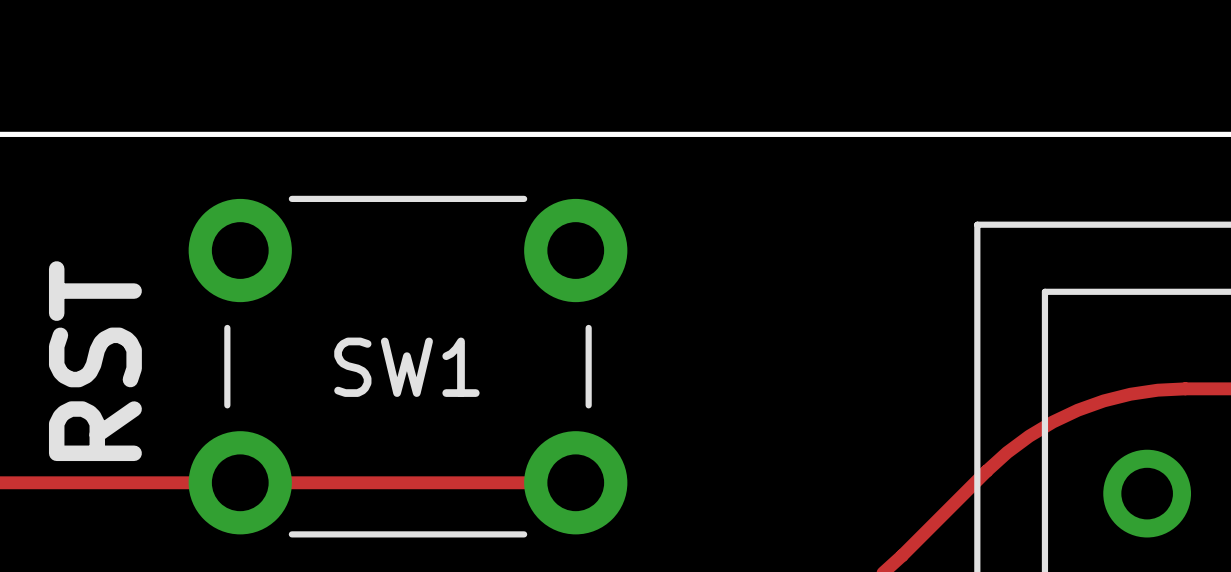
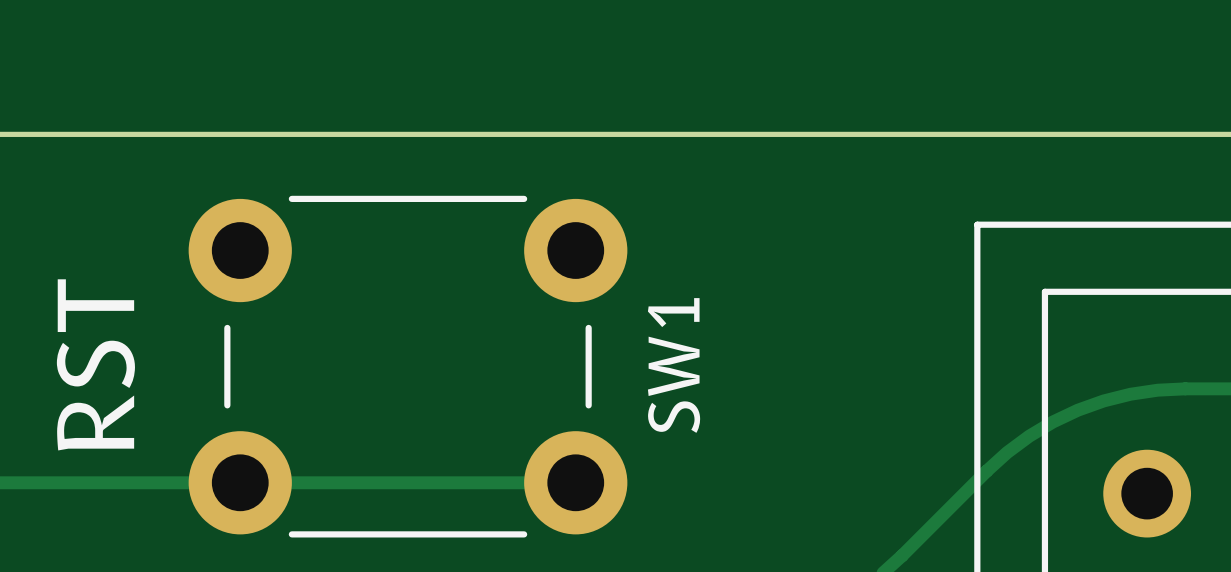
SW1 name rotation: 0° (406, 367) -> 90° counterclockwise (674, 365)
SW1 name position: SW1 (406, 367) -> SW1 (674, 365)

